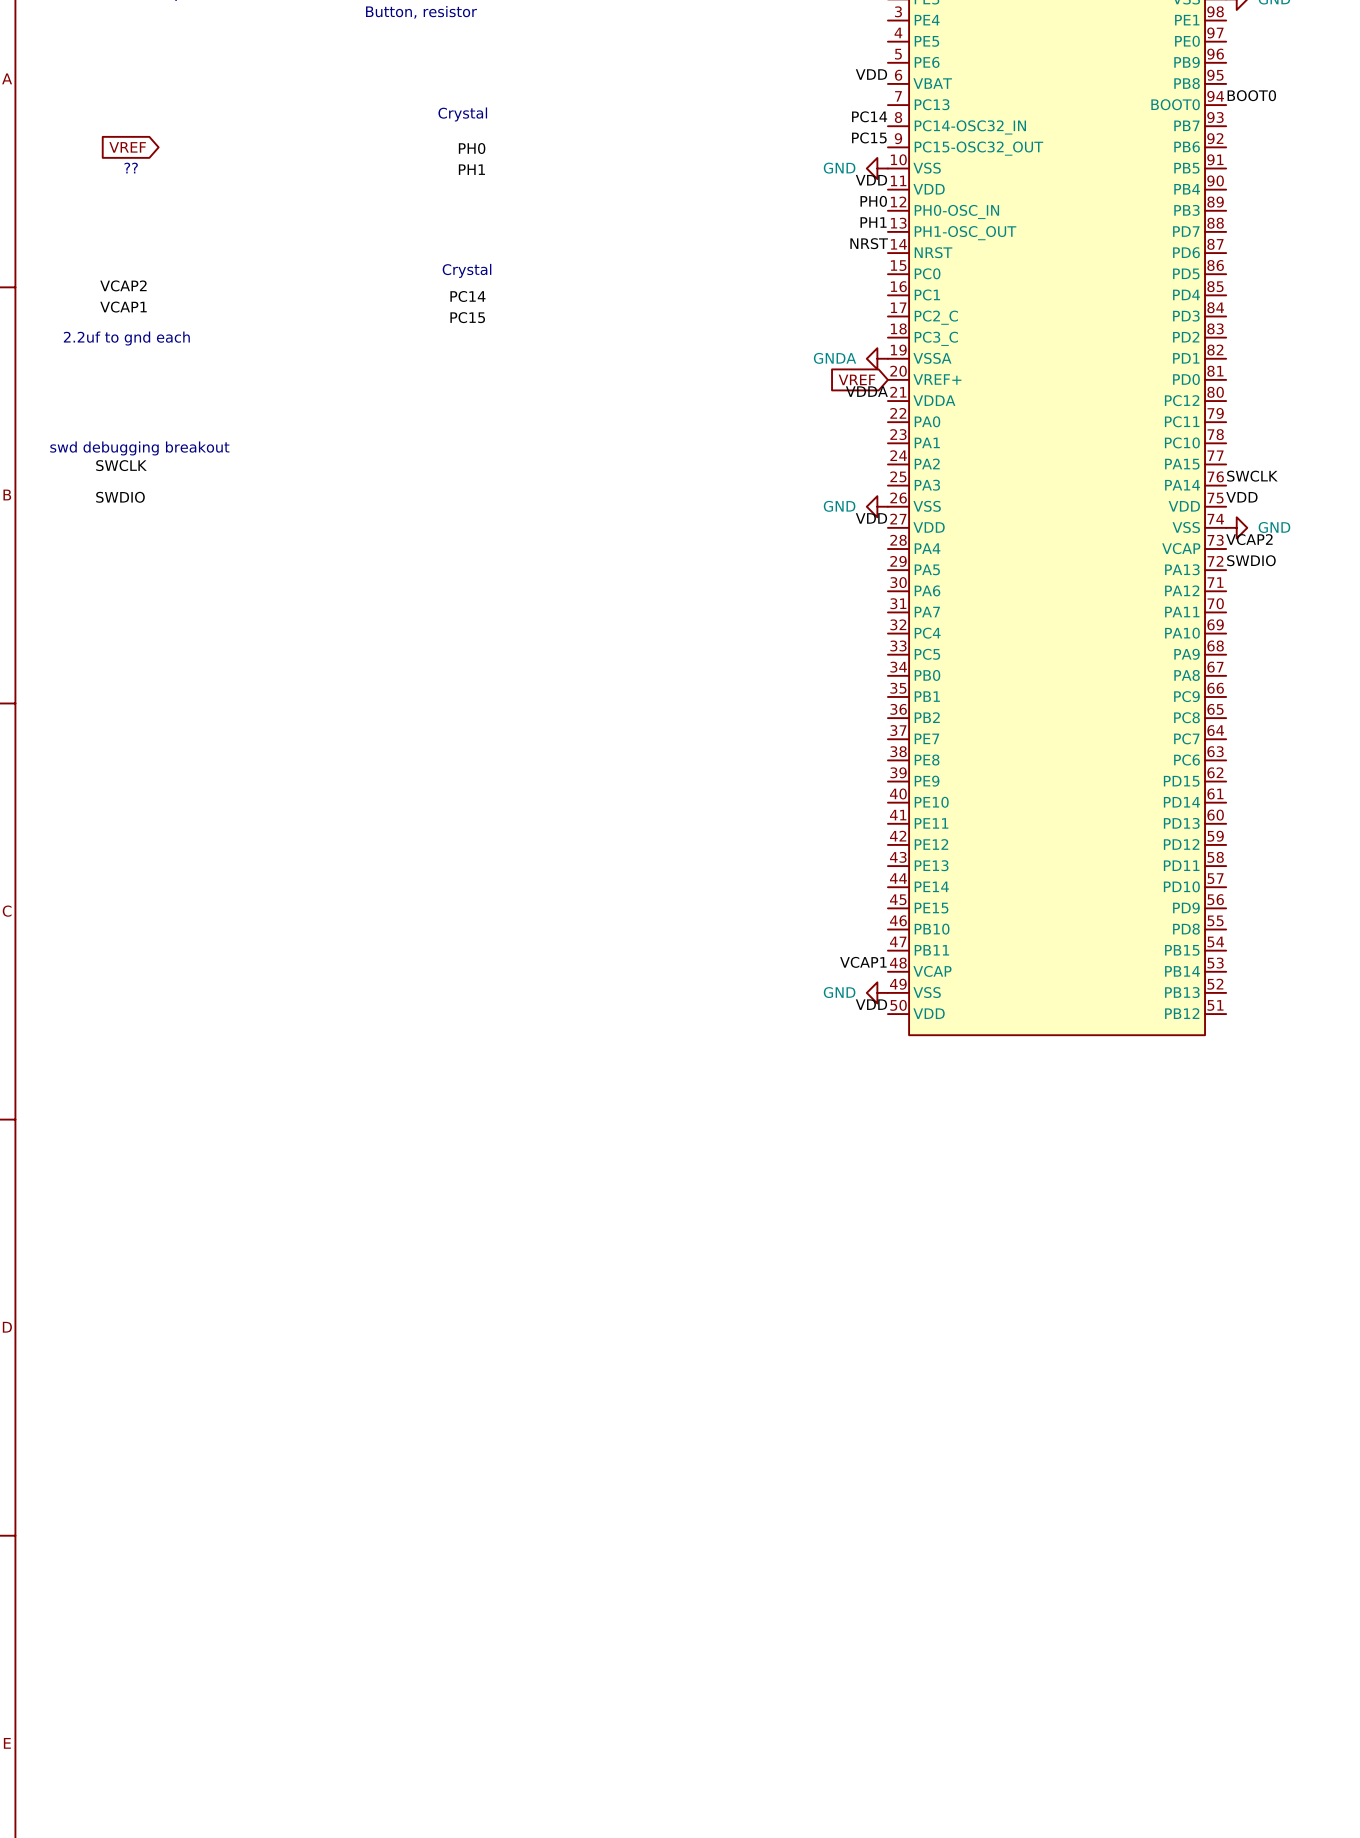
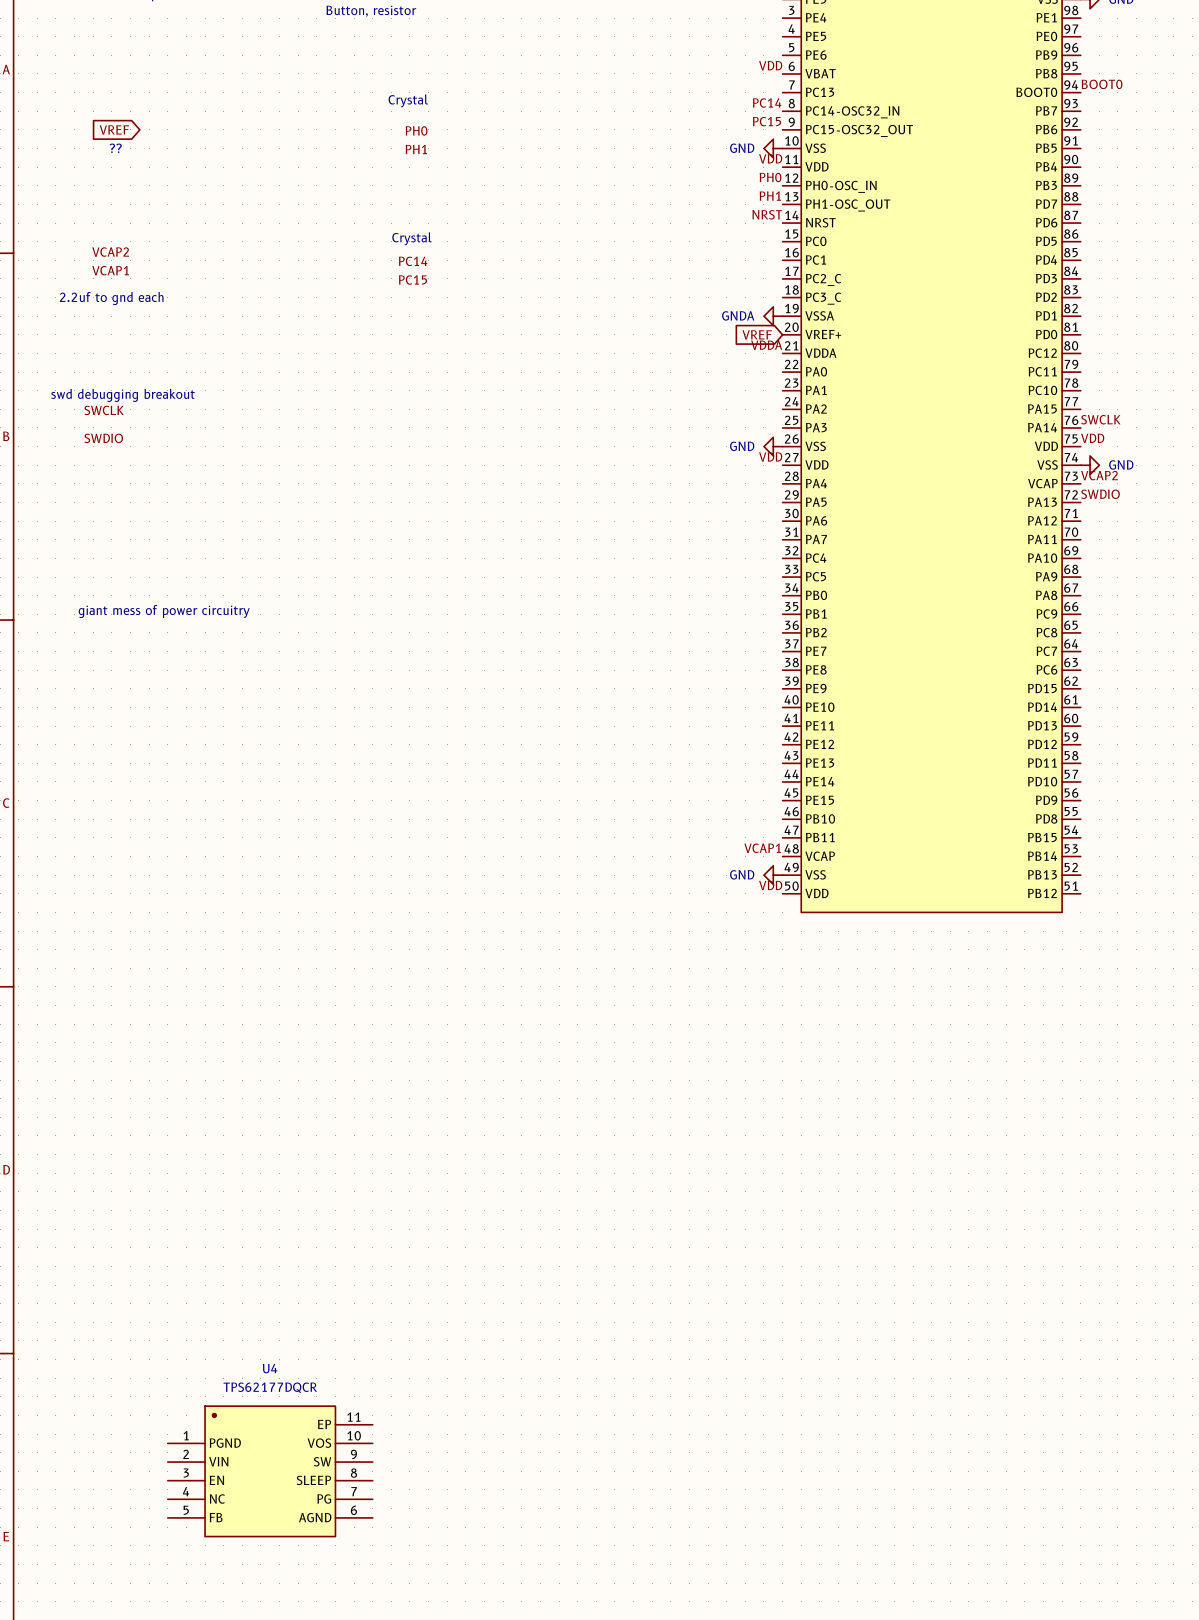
text: none -> giant mess of power circuitry (164, 611)
U4: none -> TPS62177DQCR (270, 1471)

